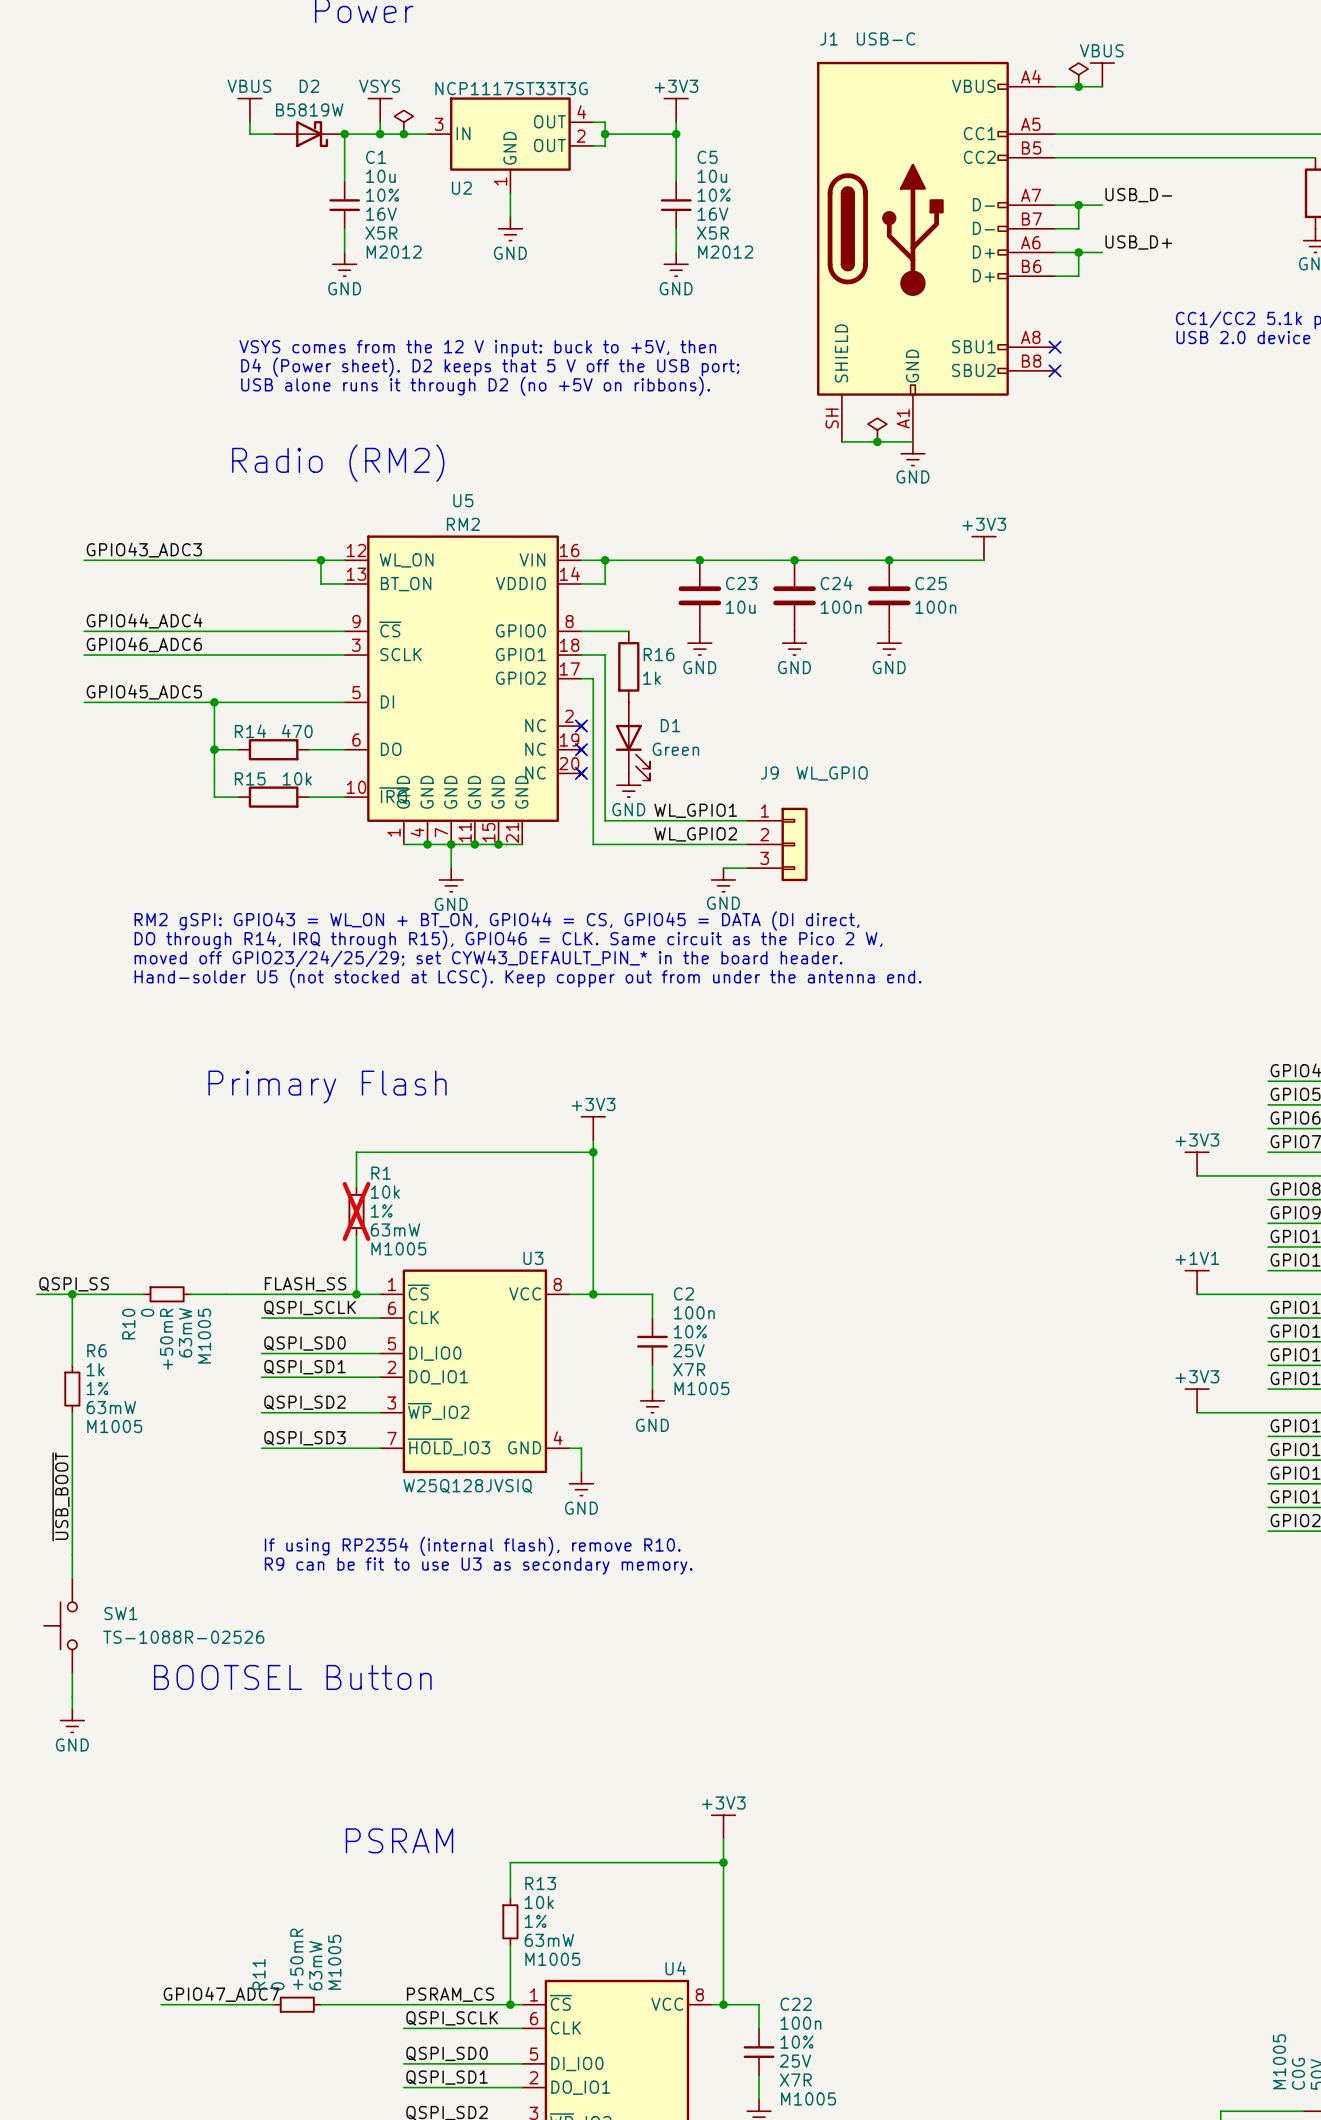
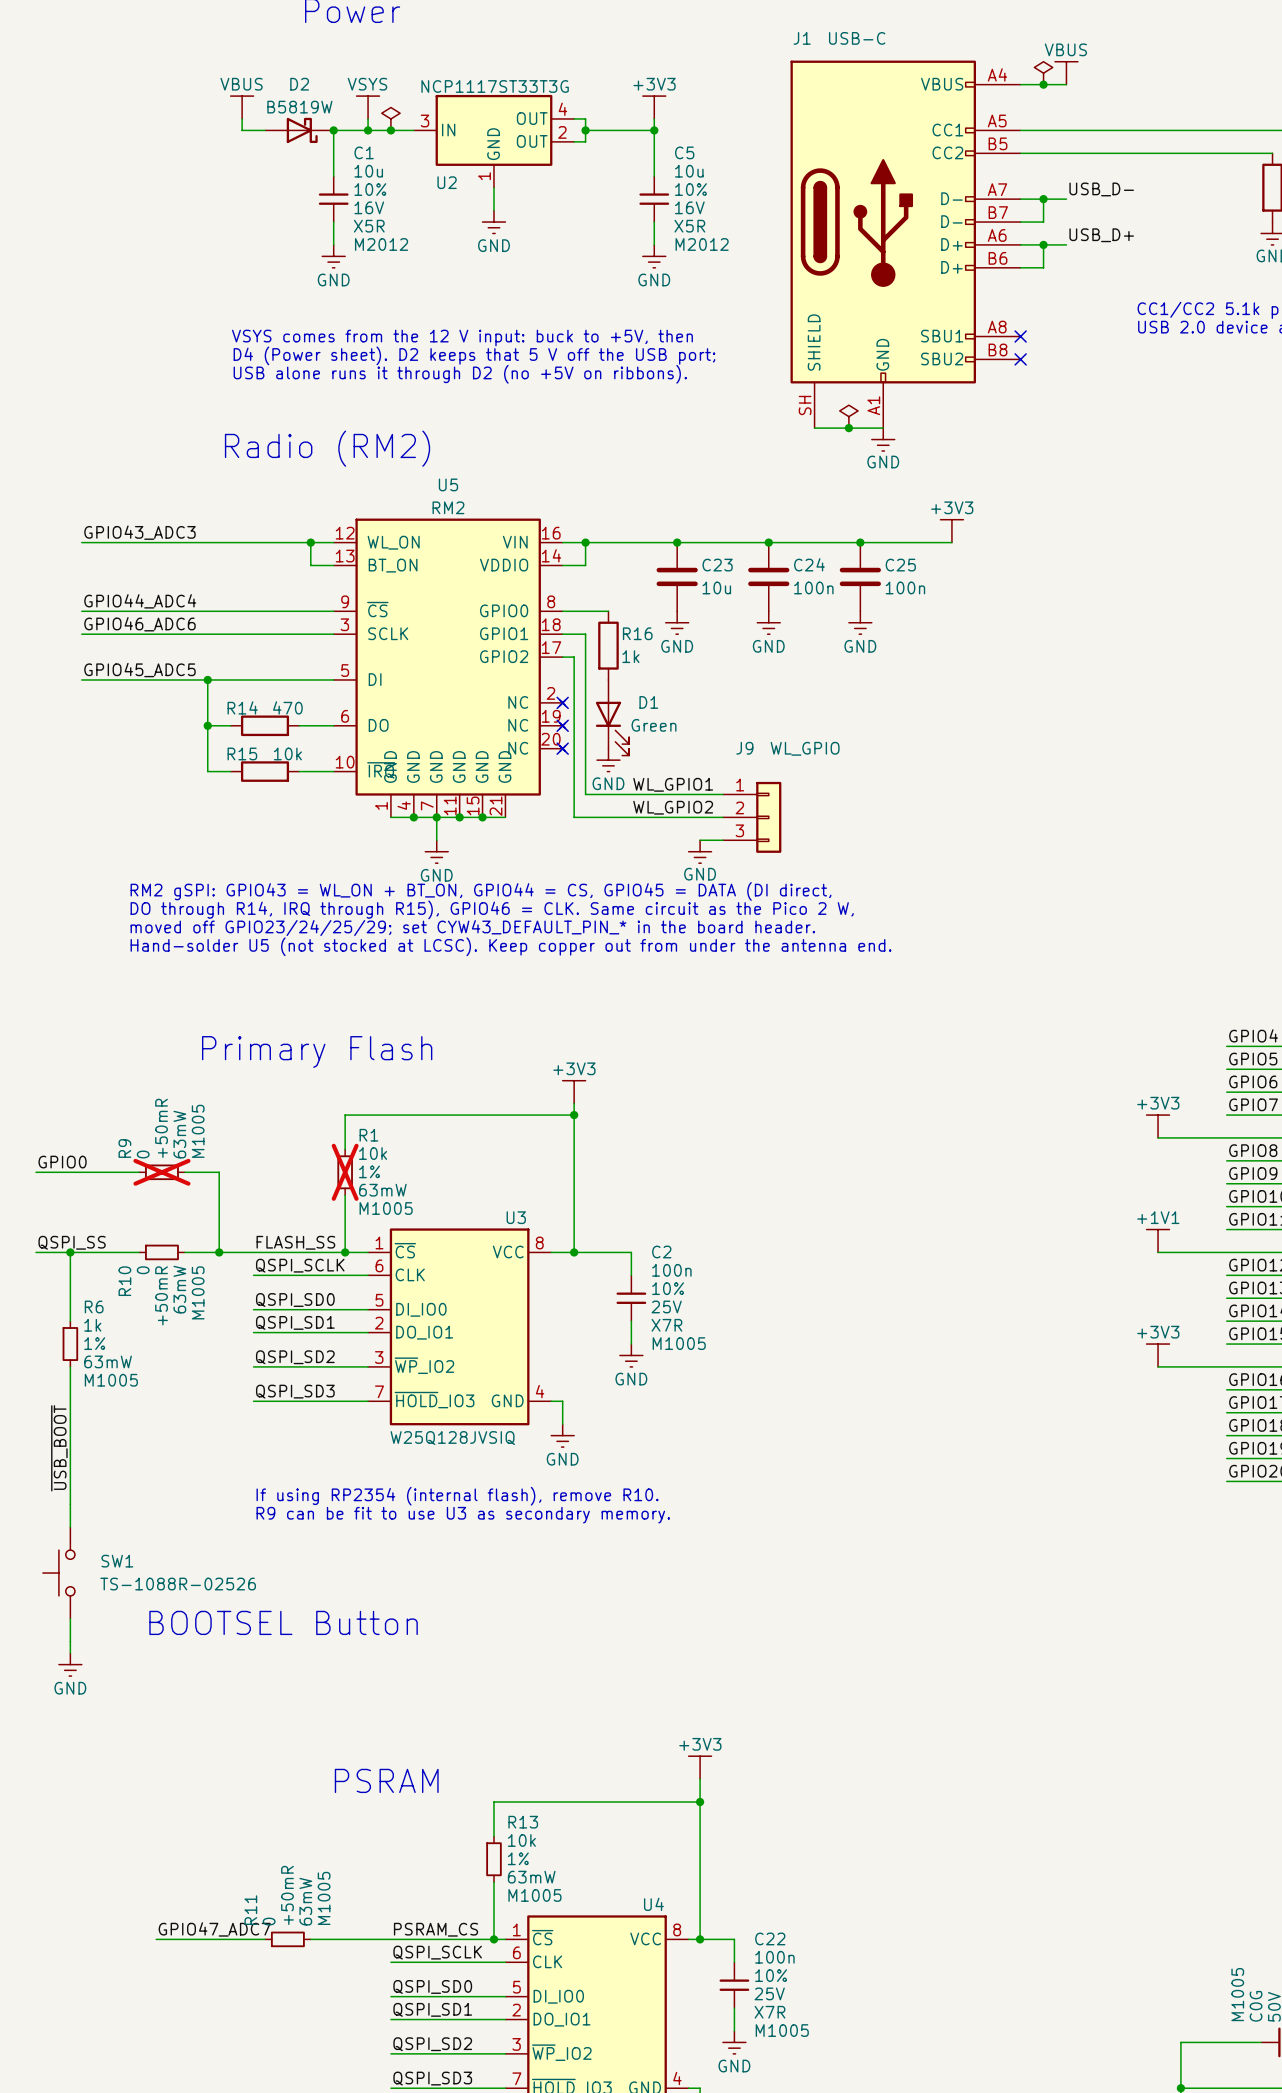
label: none -> GPIO0 (62, 1162)
wire: none -> (36, 1172) (139, 1172)
R9: none -> 0 (161, 1172)
wire: none -> (184, 1172) (219, 1172) (219, 1252)
junction: none -> (219, 1252)

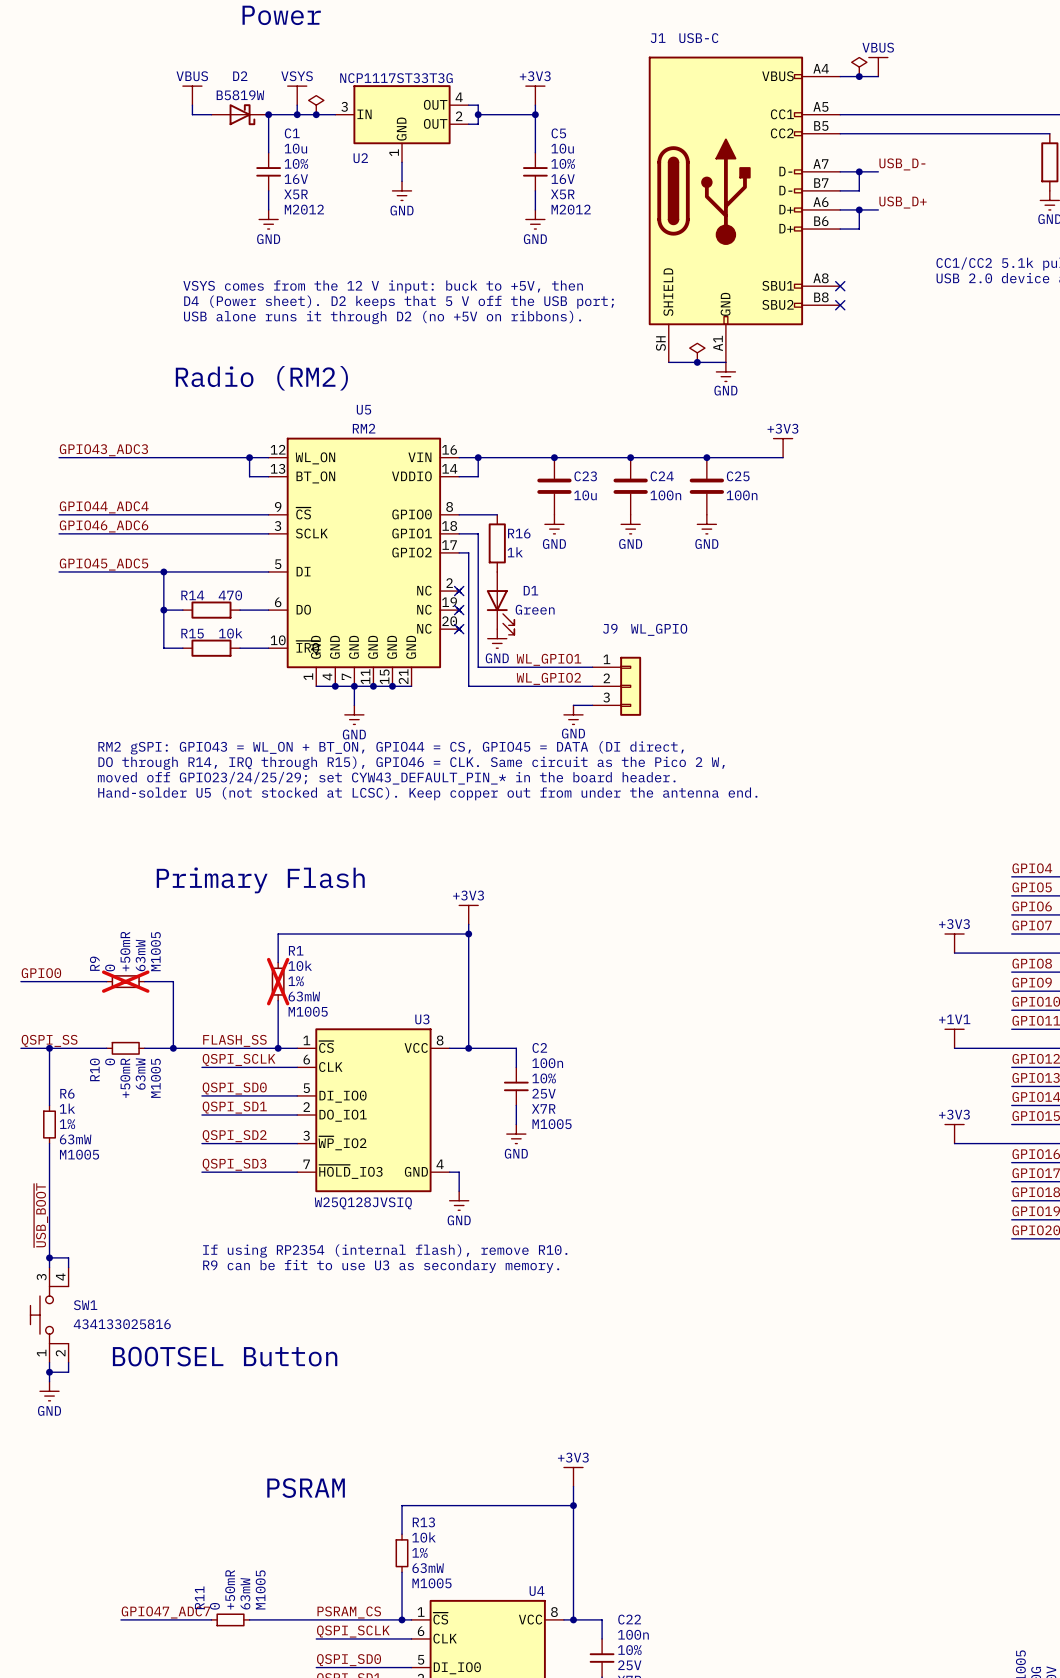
wire: none -> (49, 1257) (68, 1257) (68, 1267)
junction: none -> (49, 1257)
SW1 symbol: [42, 1527, 75, 1619] -> [30, 1267, 69, 1363]
SW1 value: TS-1088R-02526 (178, 1584) -> 434133025816 (122, 1324)
wire: none -> (68, 1362) (68, 1372) (49, 1372)
junction: none -> (49, 1372)

